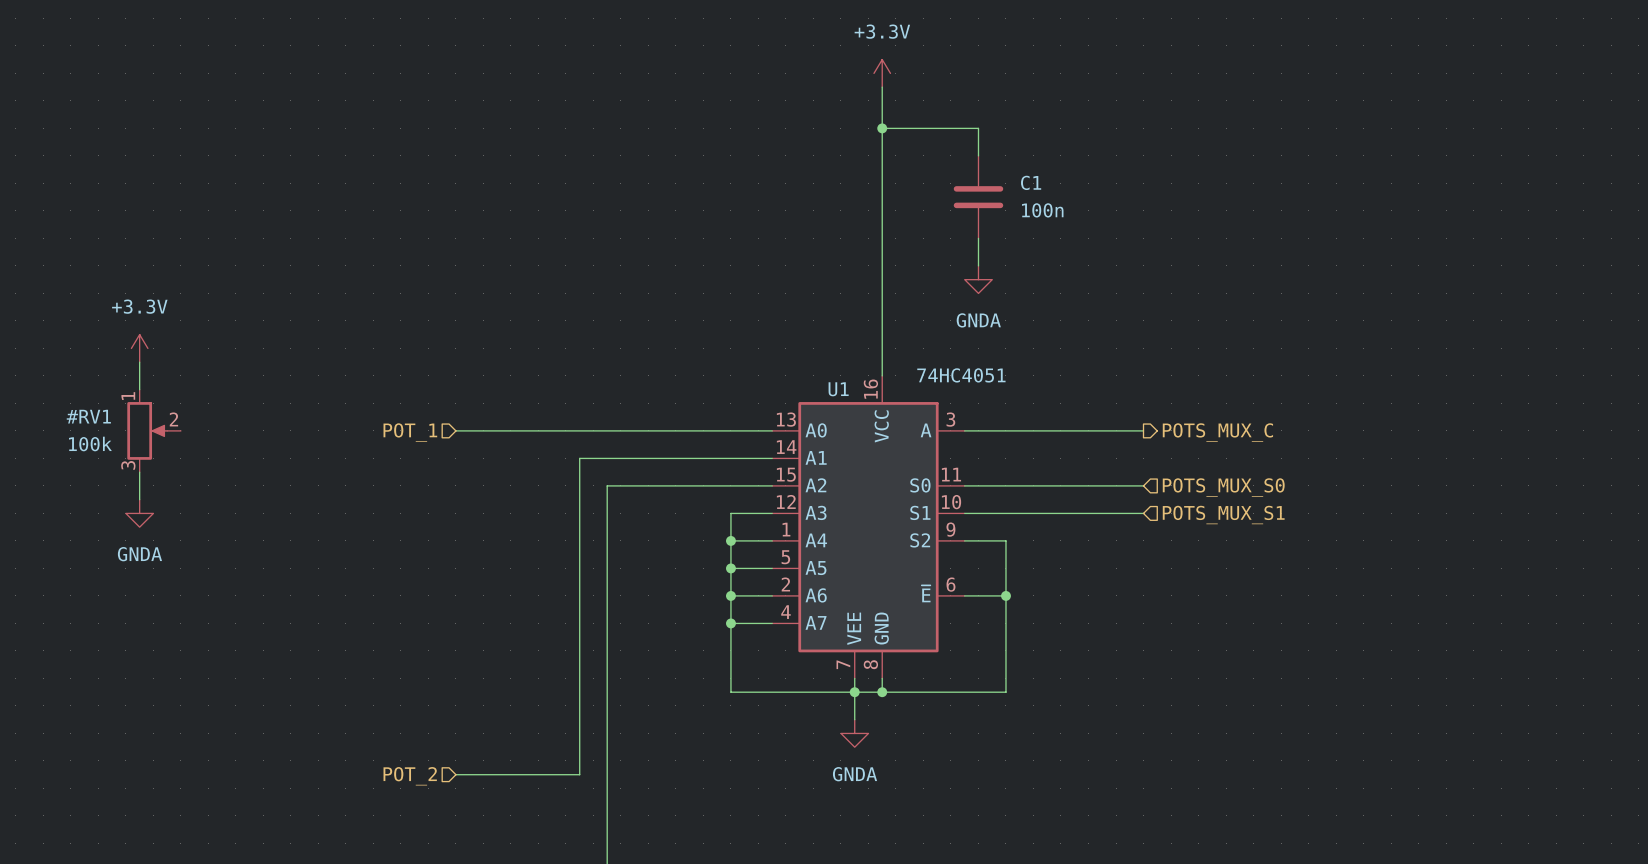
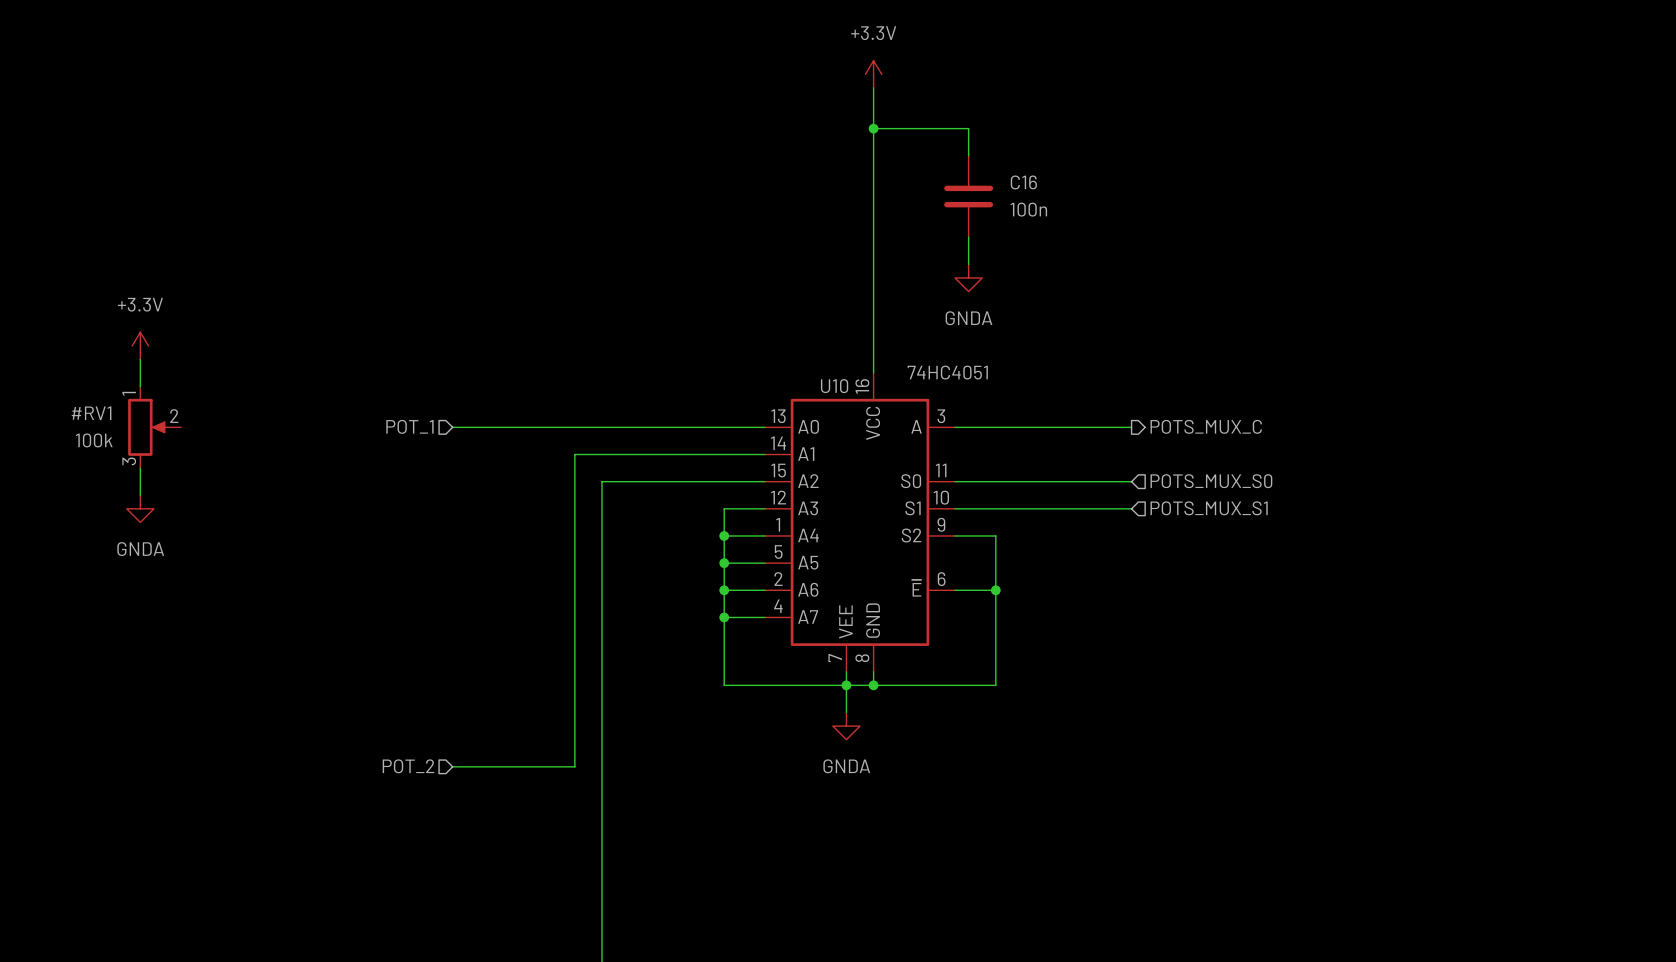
C1 name: C1 (1031, 182) -> C16 (1023, 182)
U1 name: U1 (838, 389) -> U10 (834, 386)

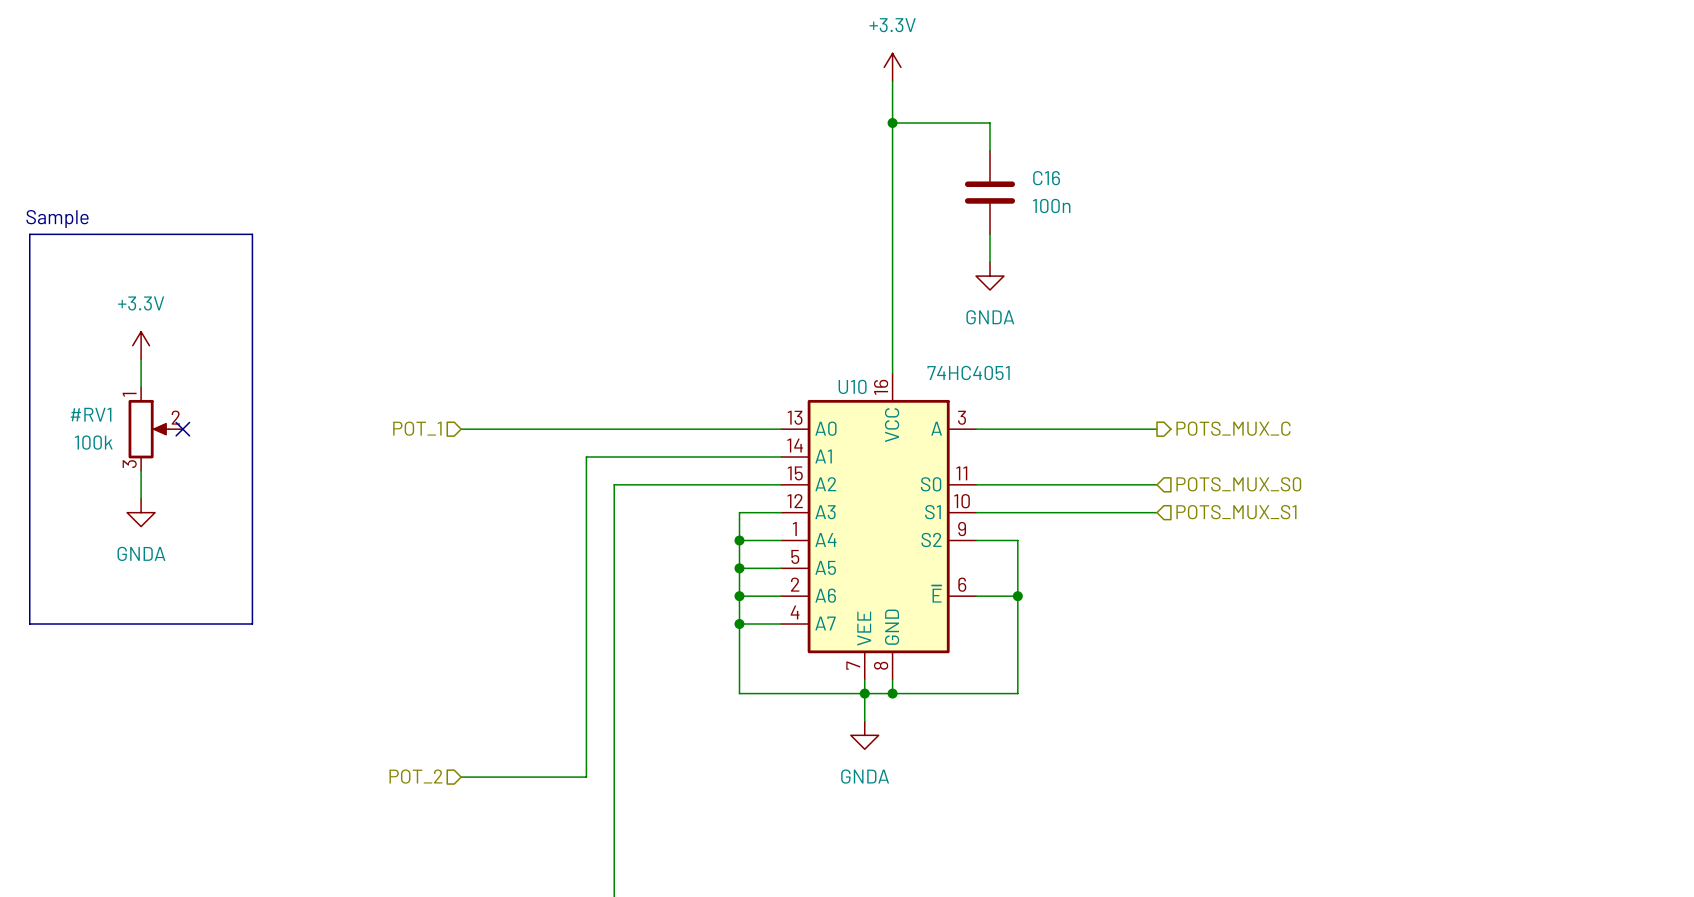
text: none -> Sample (57, 219)
line: none -> (29, 234) (252, 234) (252, 624) (29, 624) (29, 234)
no-connect mark: none -> (182, 429)

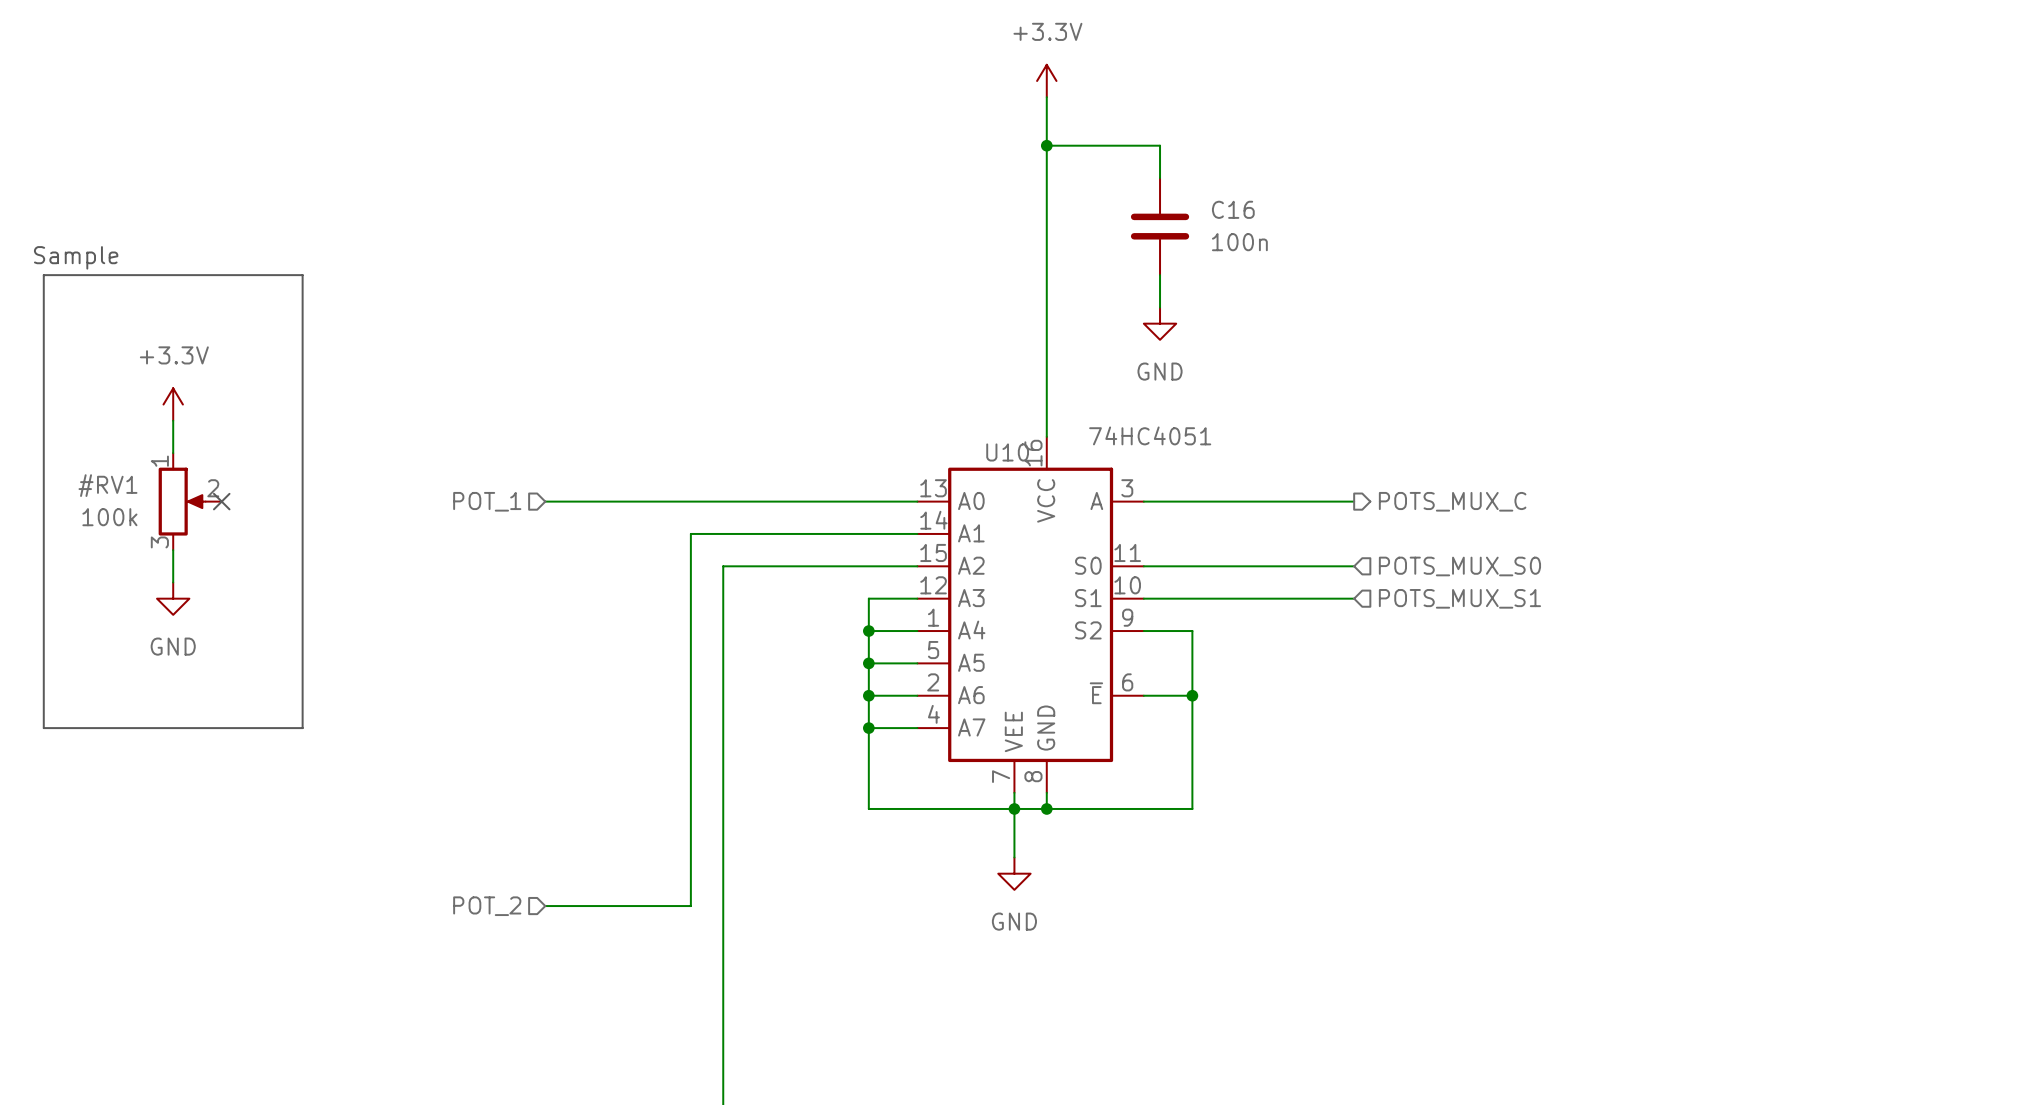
power symbol: GNDA (989, 276) -> GND (1160, 323)
power symbol: GNDA (141, 512) -> GND (173, 598)
power symbol: GNDA (864, 735) -> none
power symbol: none -> GND (1014, 873)

